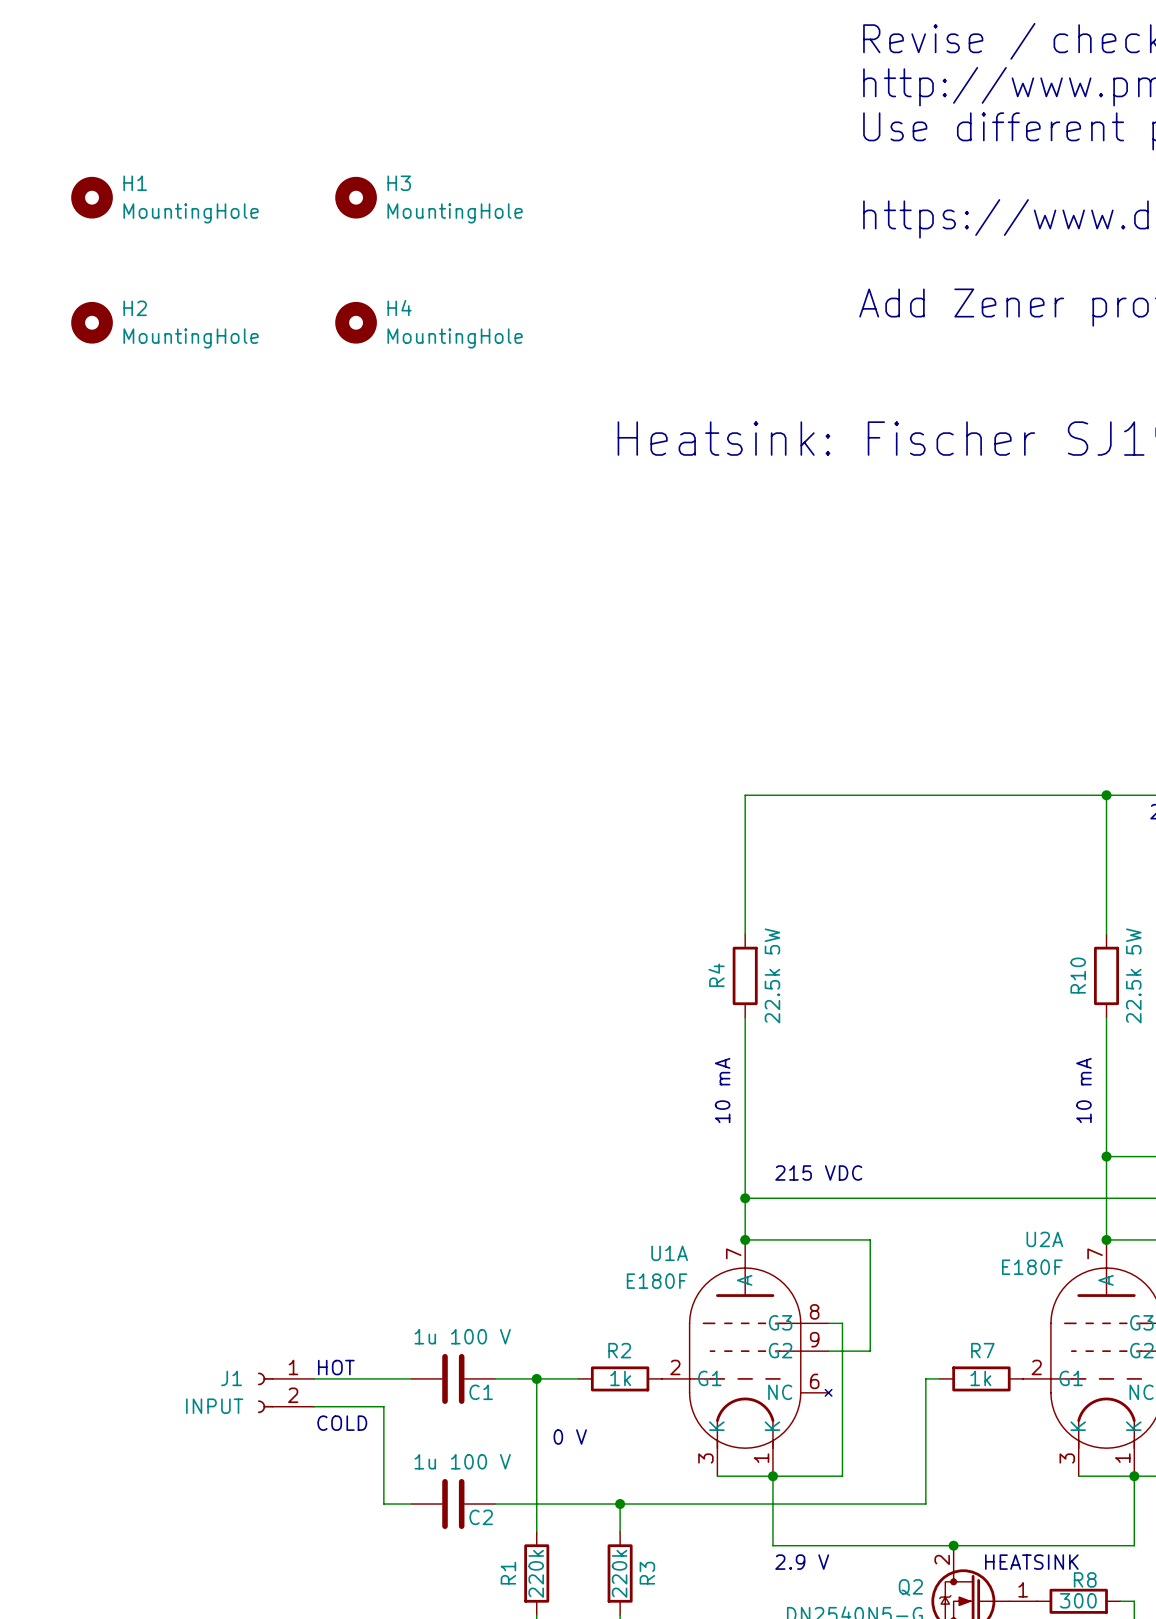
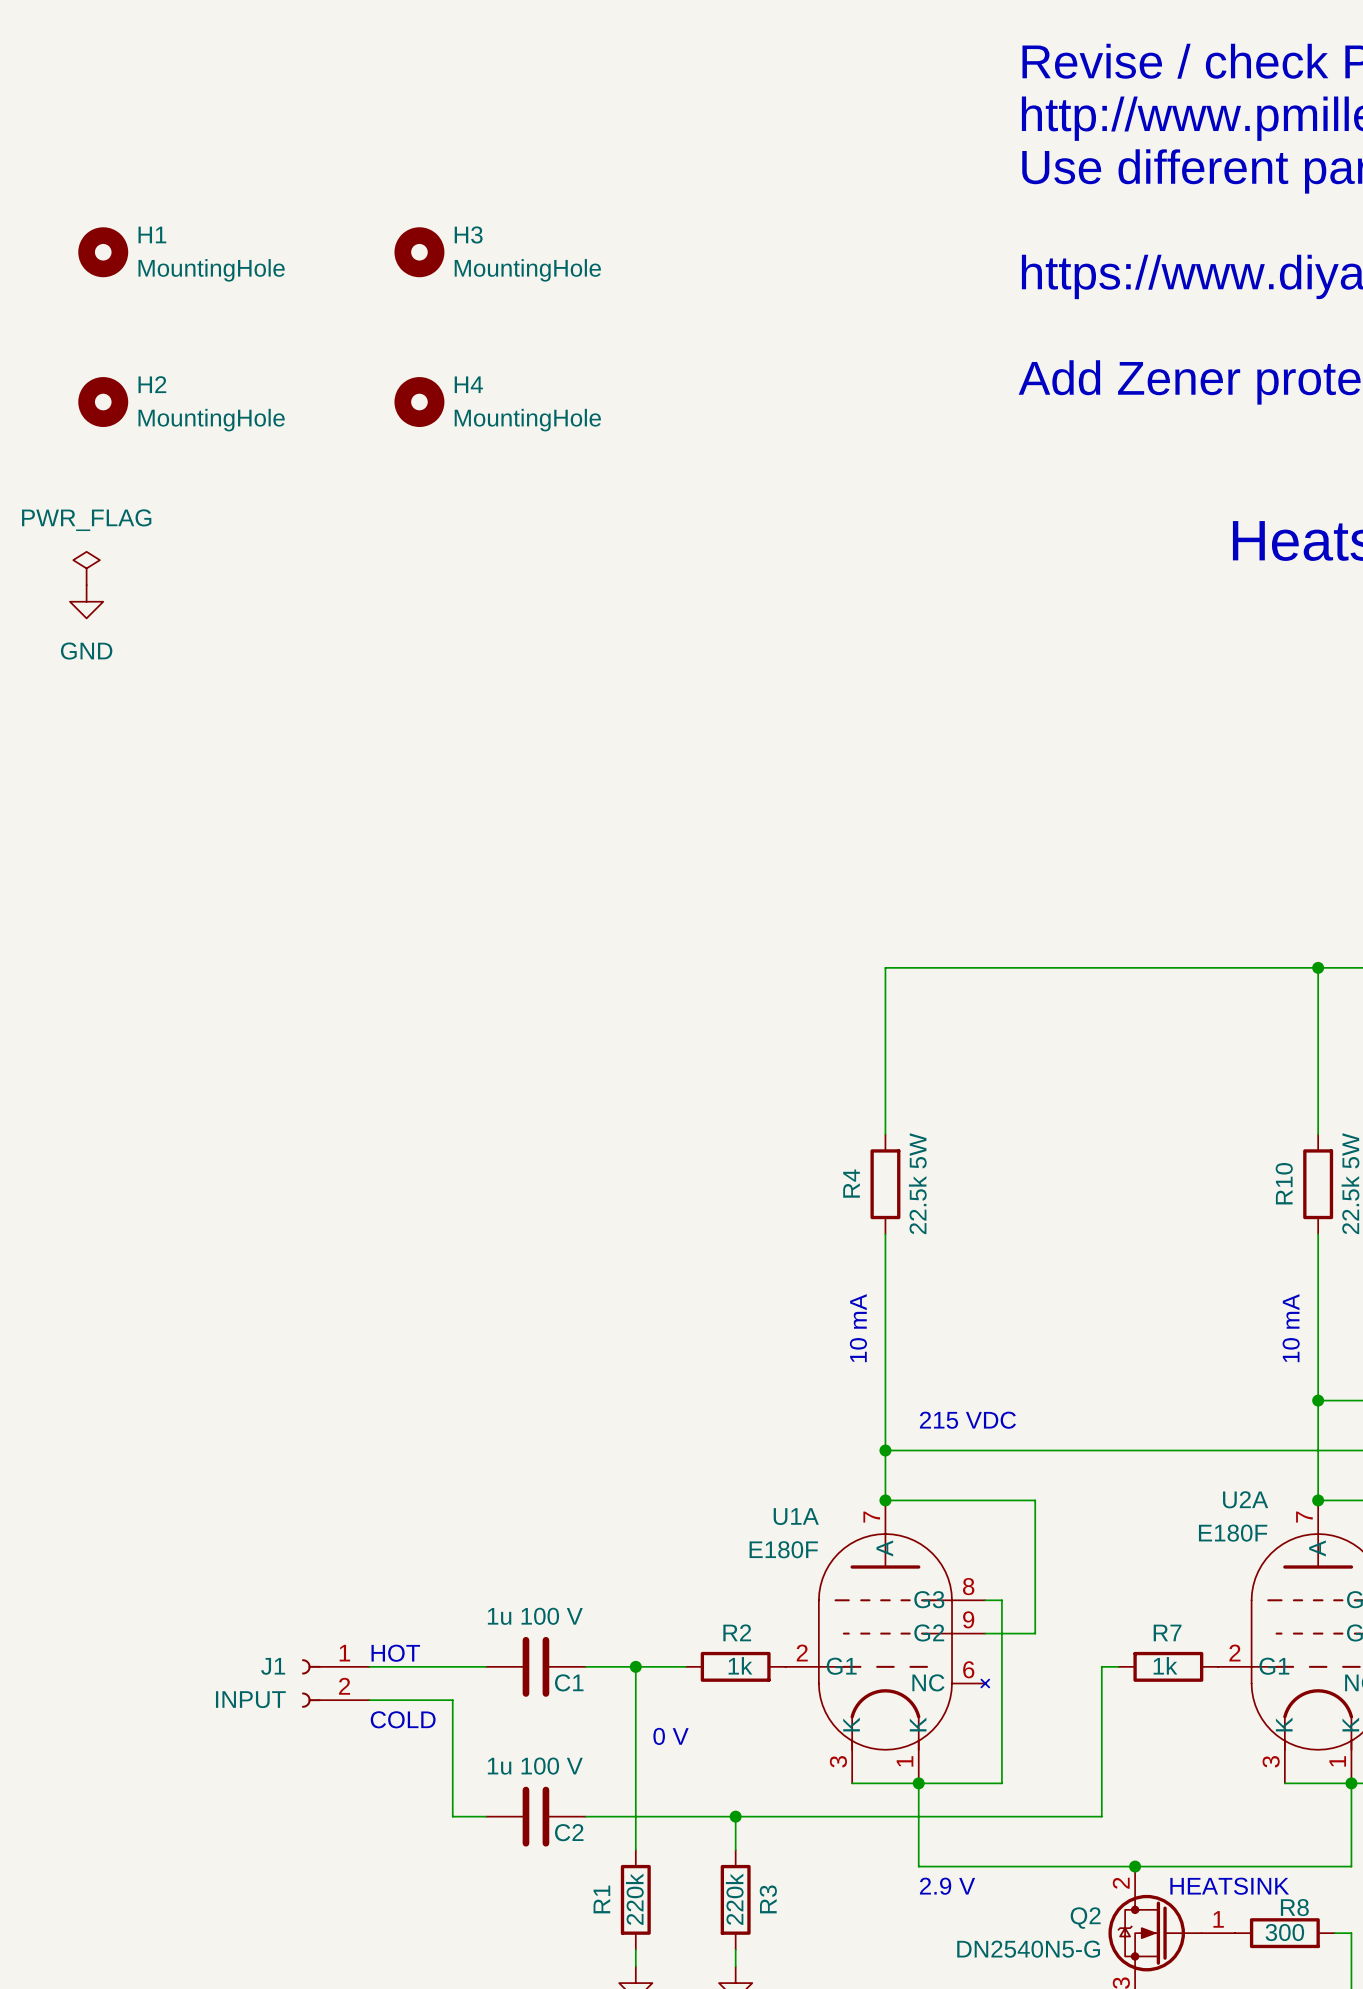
power symbol: none -> PWR_FLAG (86, 568)
power symbol: none -> GND (86, 601)

